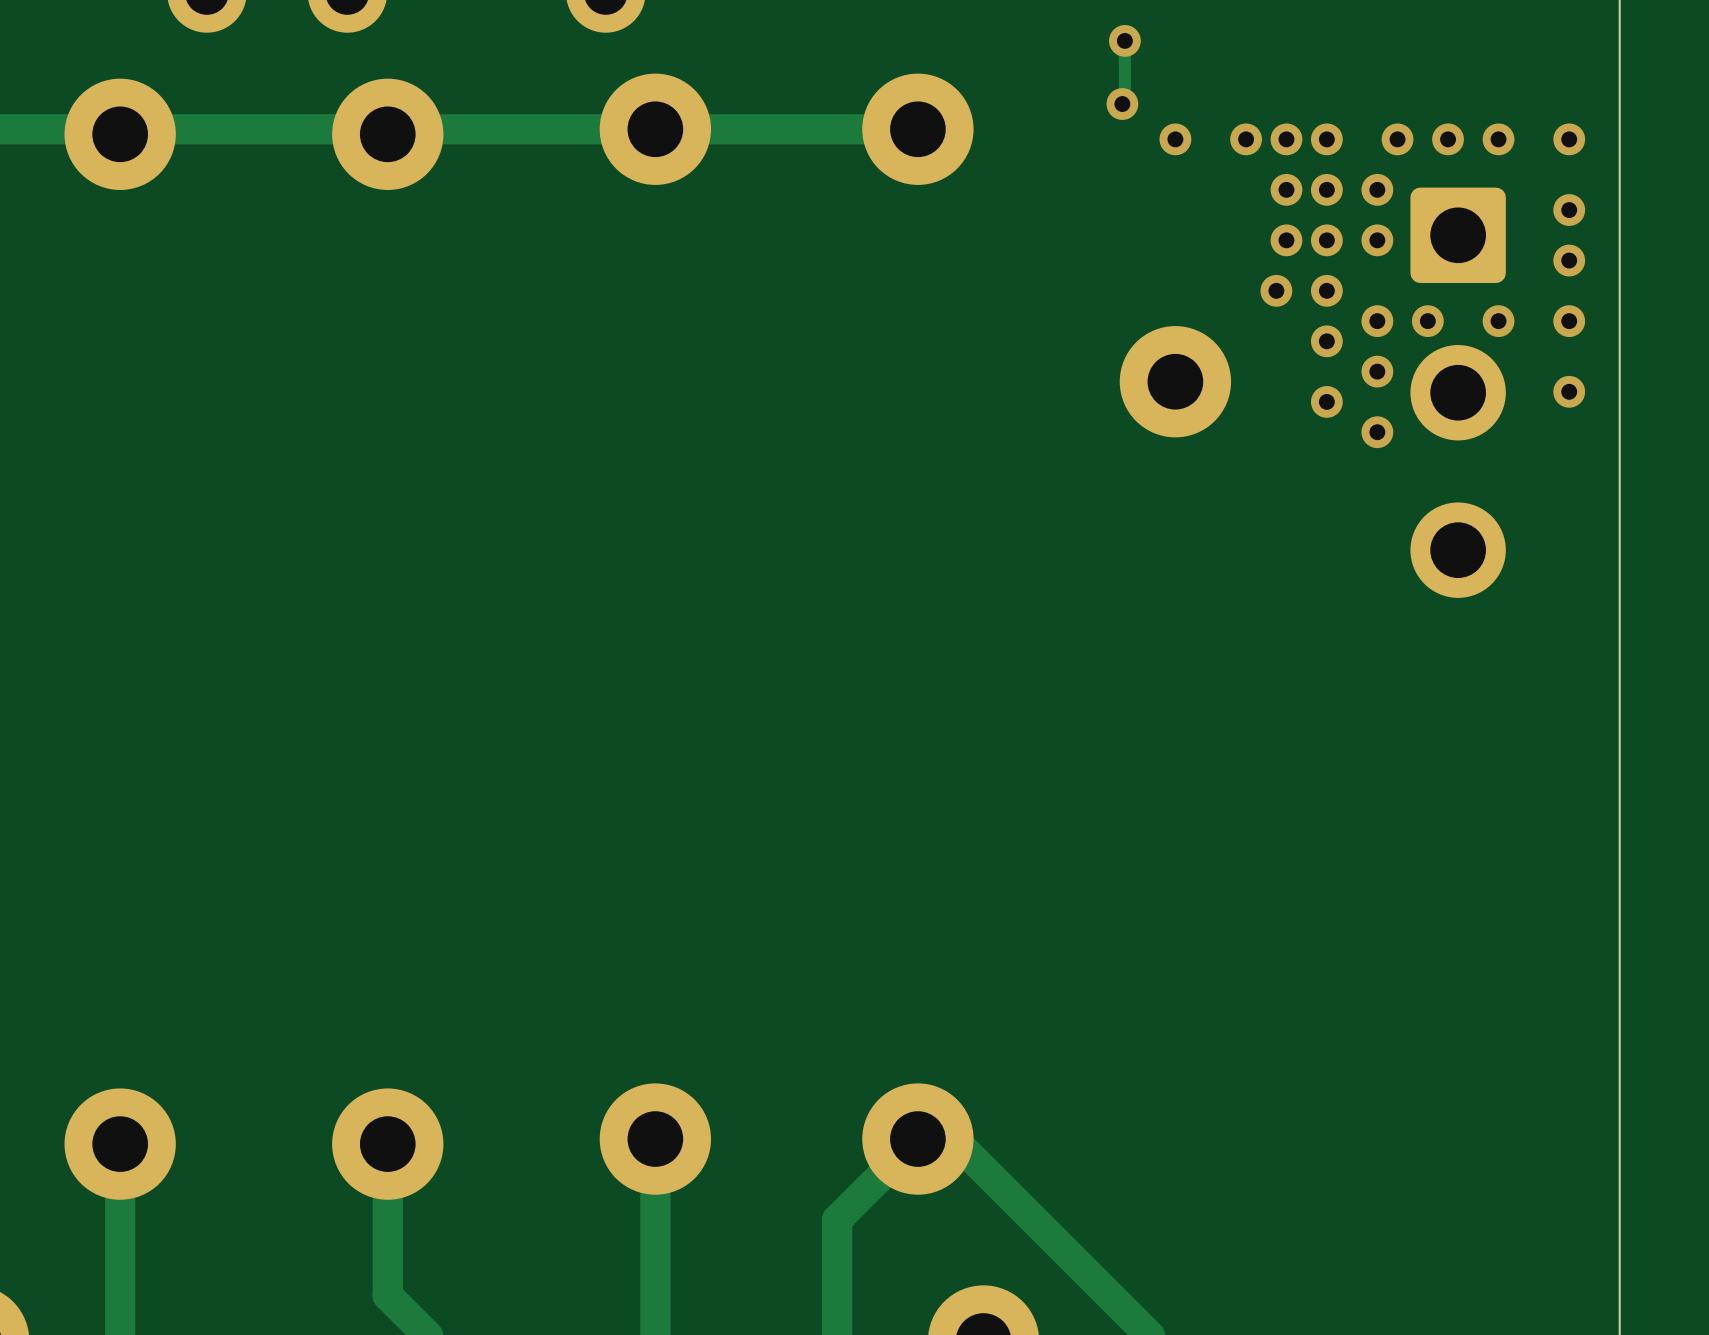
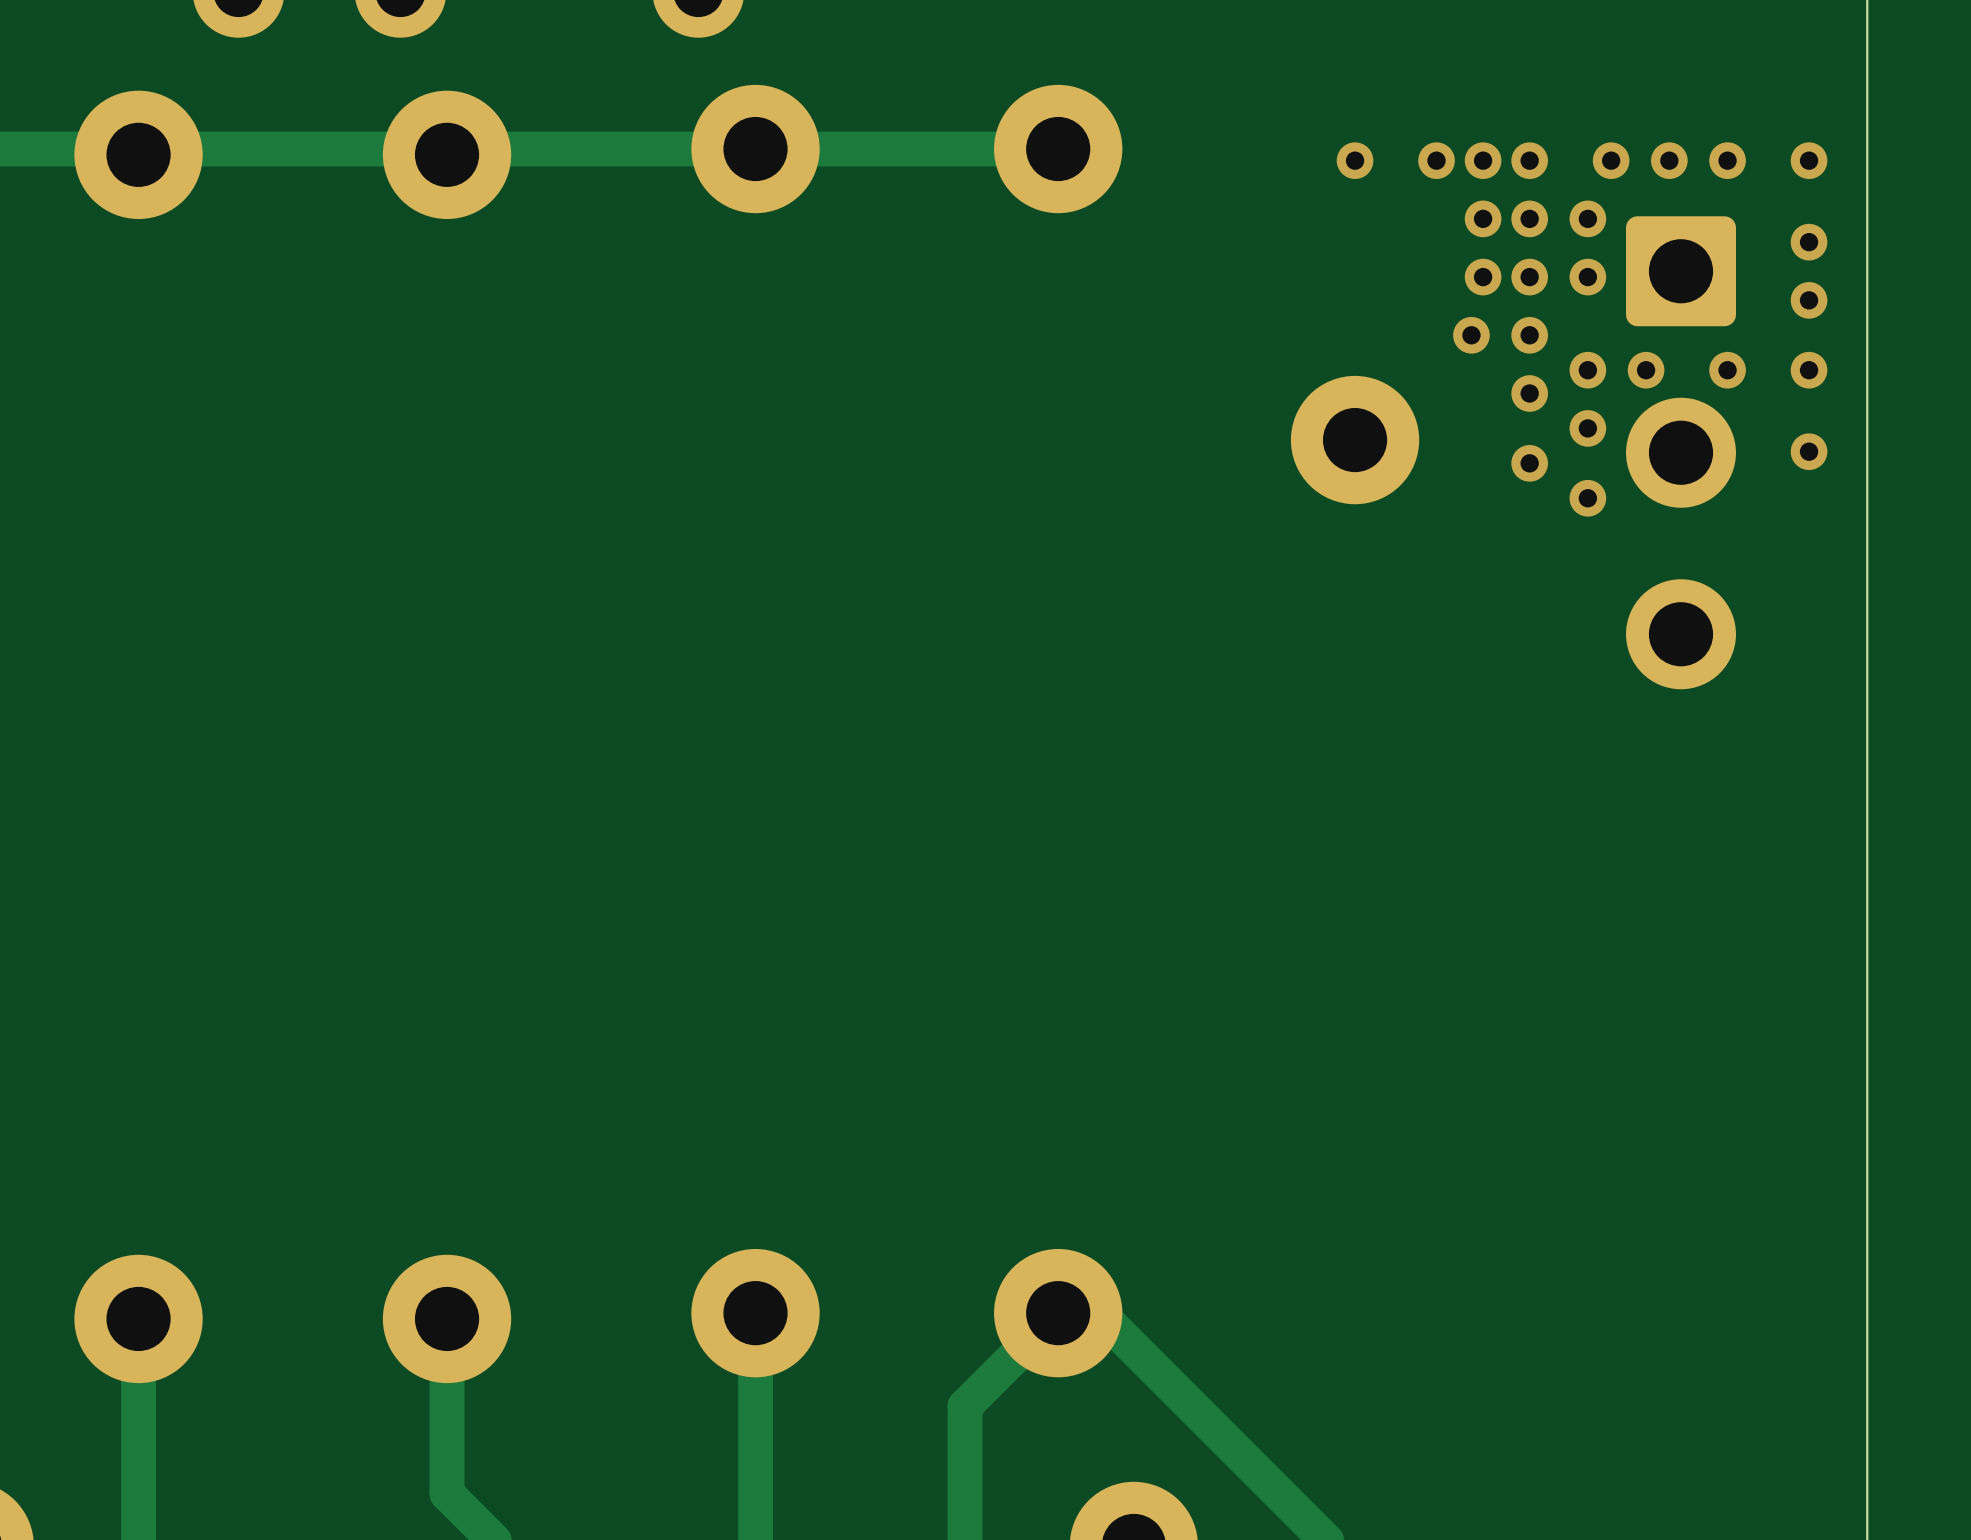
track: (1124, 40) (1124, 101) (1122, 104) -> none
via: (1124, 40) -> none
via: (1122, 104) -> none

